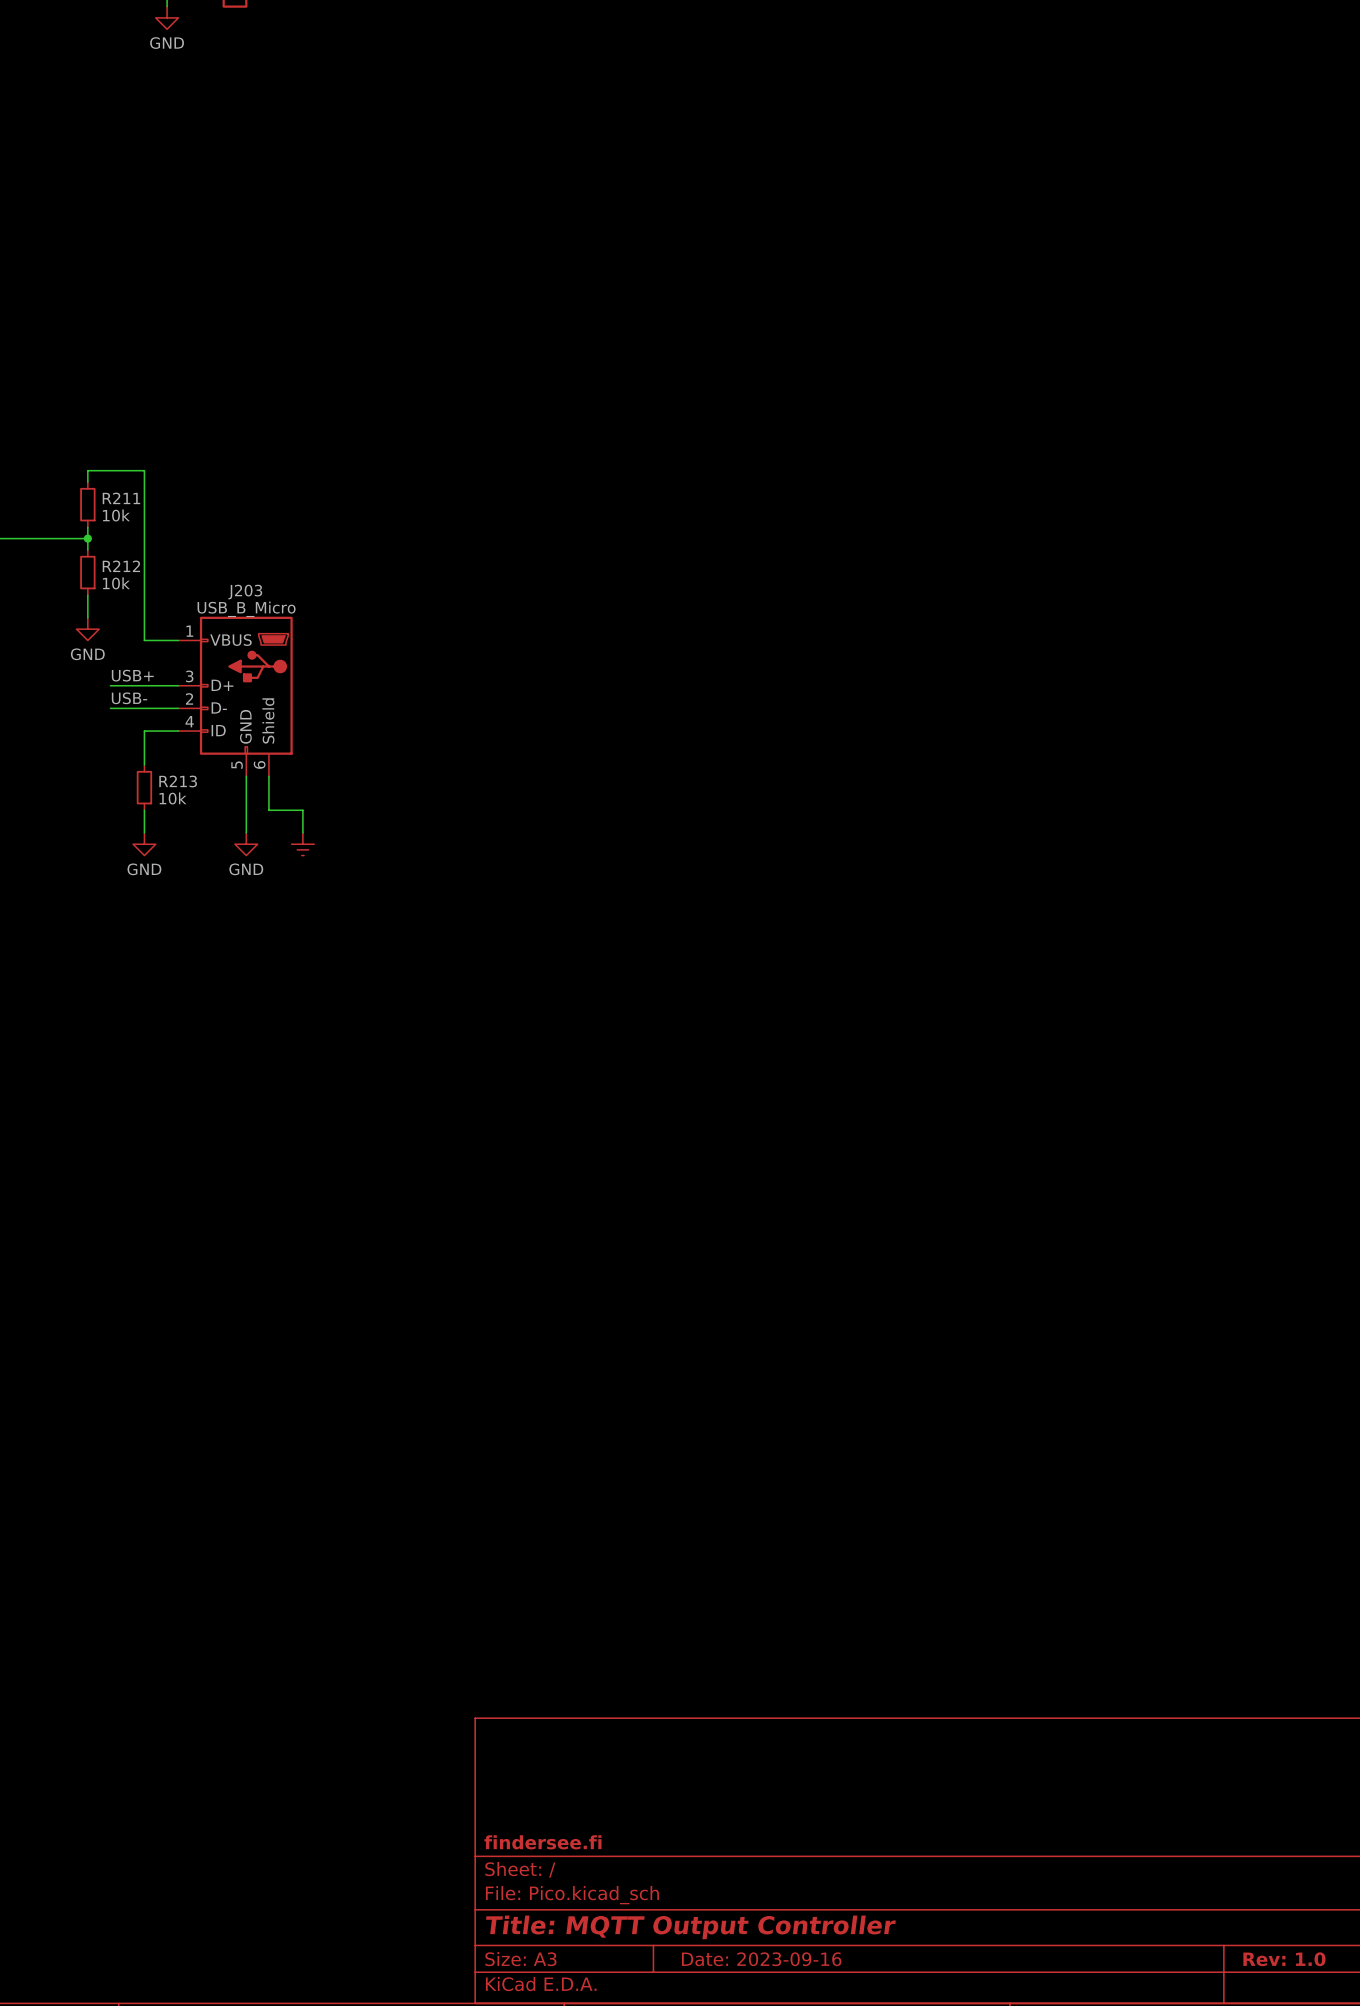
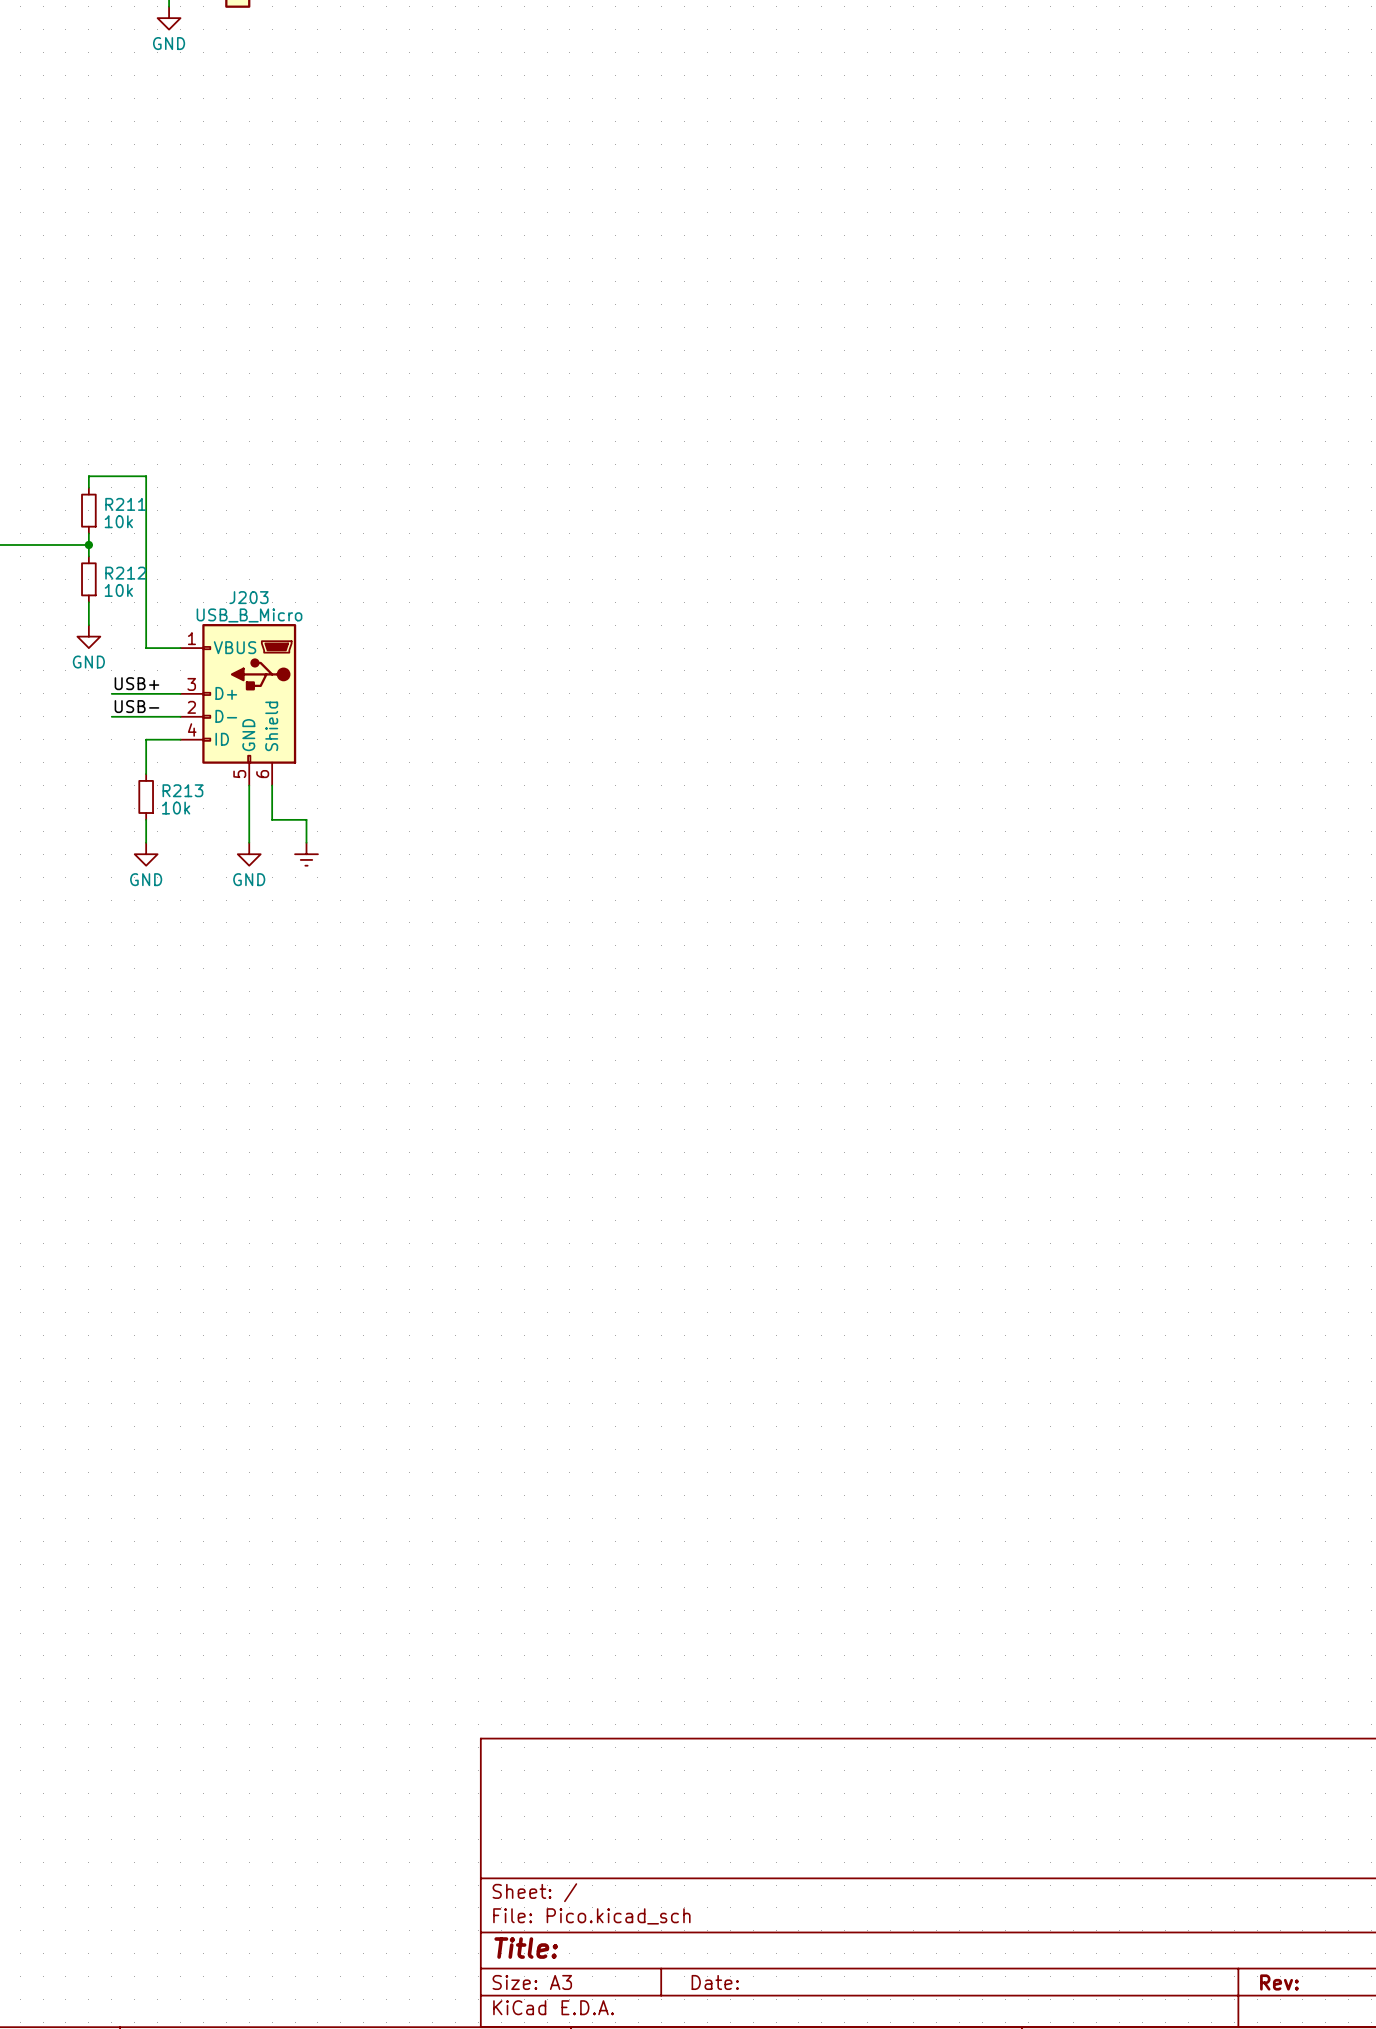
title block: findersee.fi (542, 1842) -> none
title block: Title: MQTT Output Controller (690, 1927) -> Title: (526, 1948)
title block: Date: 2023-09-16 (761, 1959) -> Date: (715, 1982)
title block: Rev: 1.0 (1284, 1959) -> Rev: (1279, 1982)

